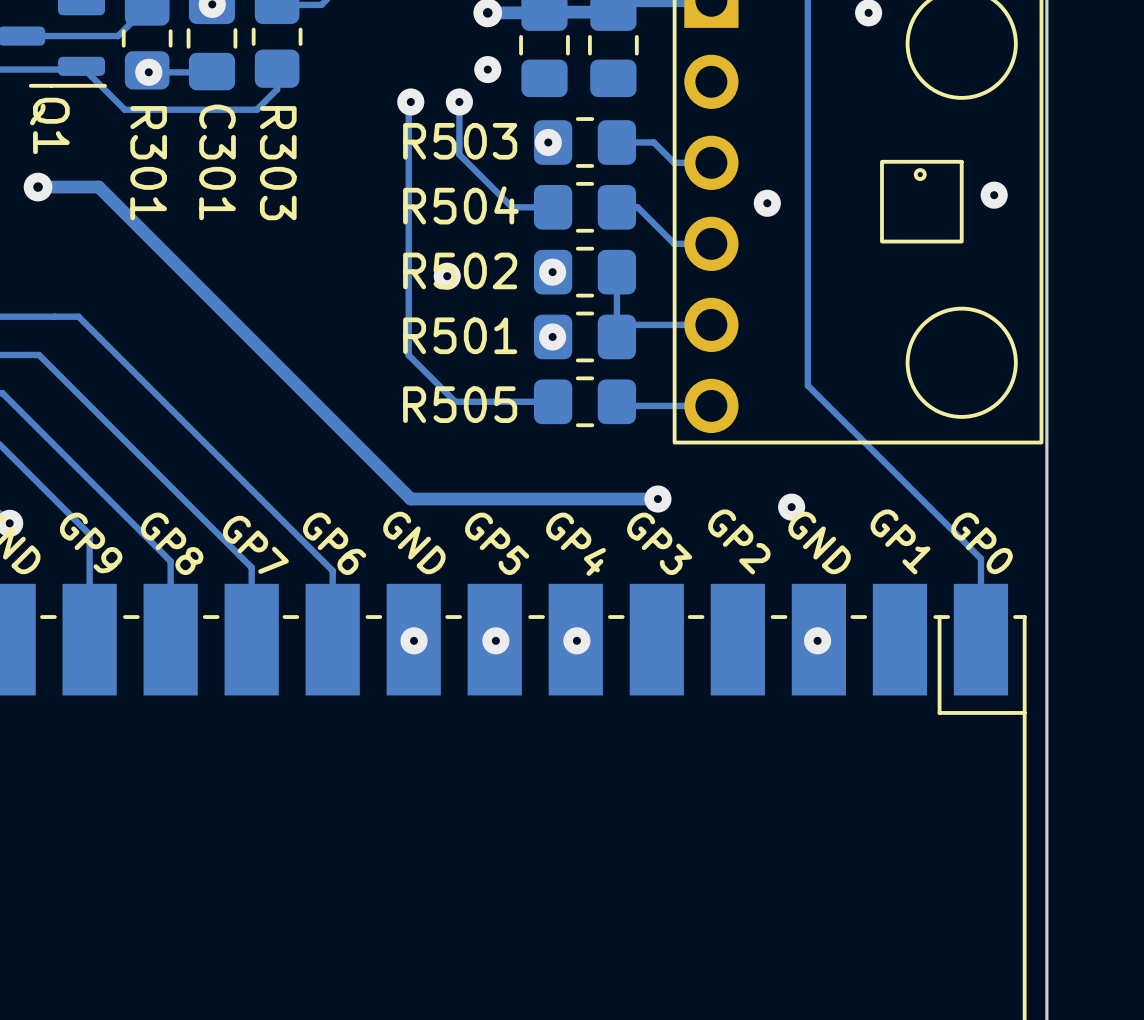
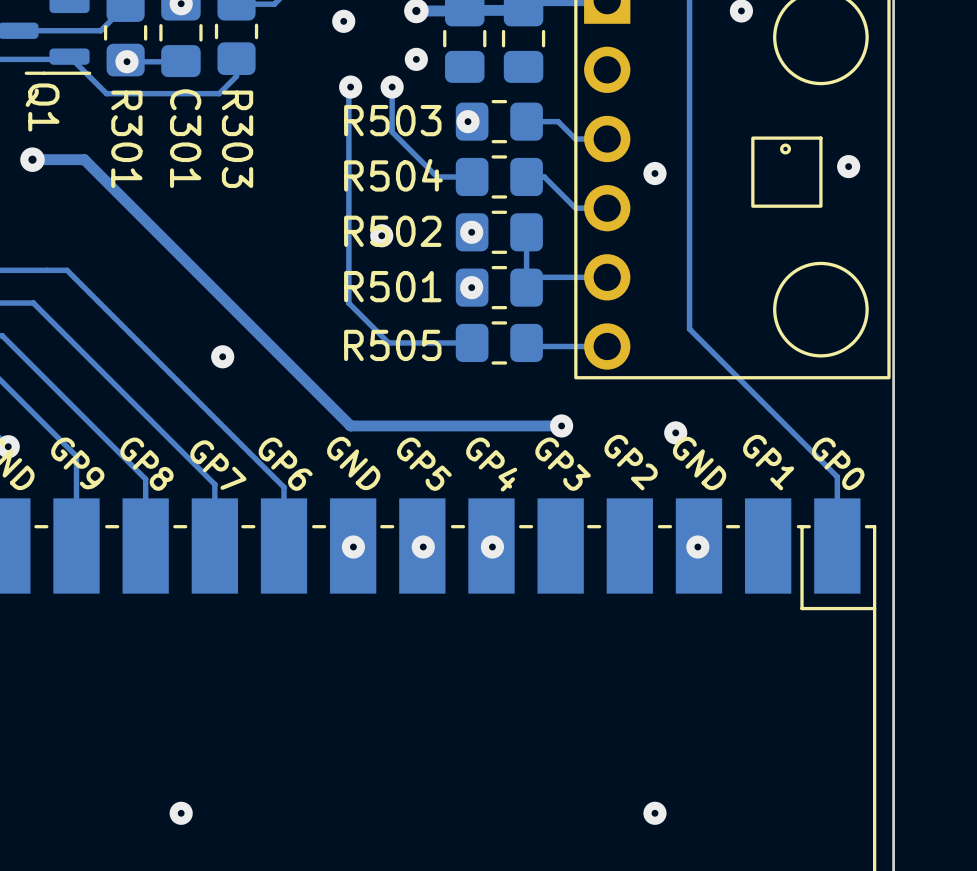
via: none -> (343, 21)
via: none -> (222, 356)
via: none -> (181, 813)
via: none -> (654, 813)

